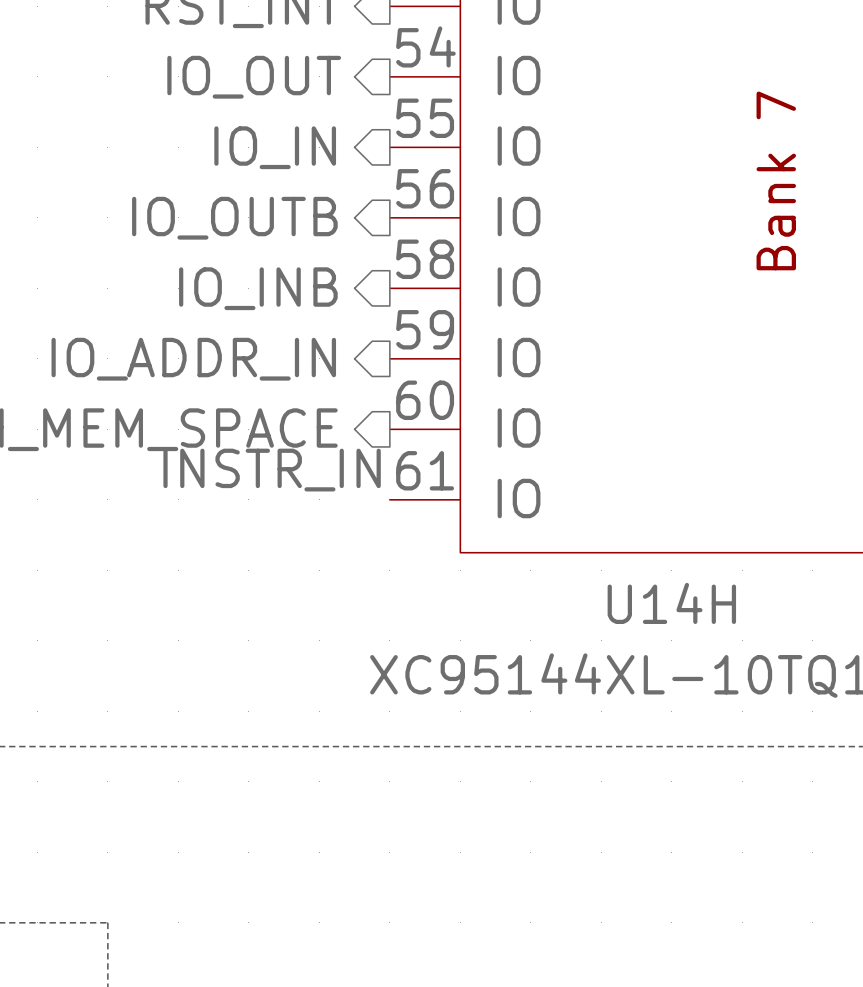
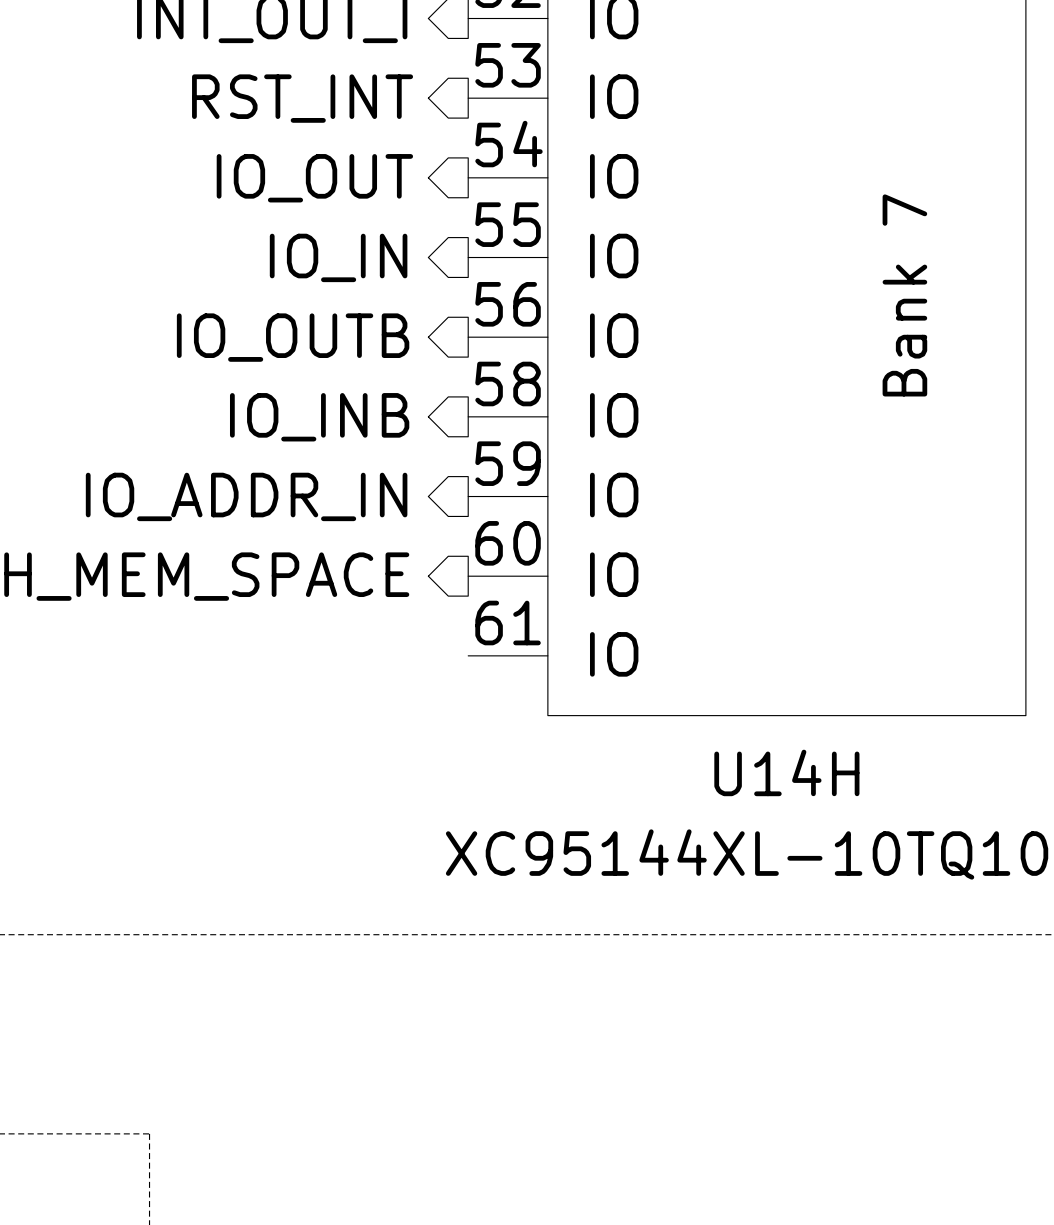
label: INSTR_IN (272, 470) -> none

